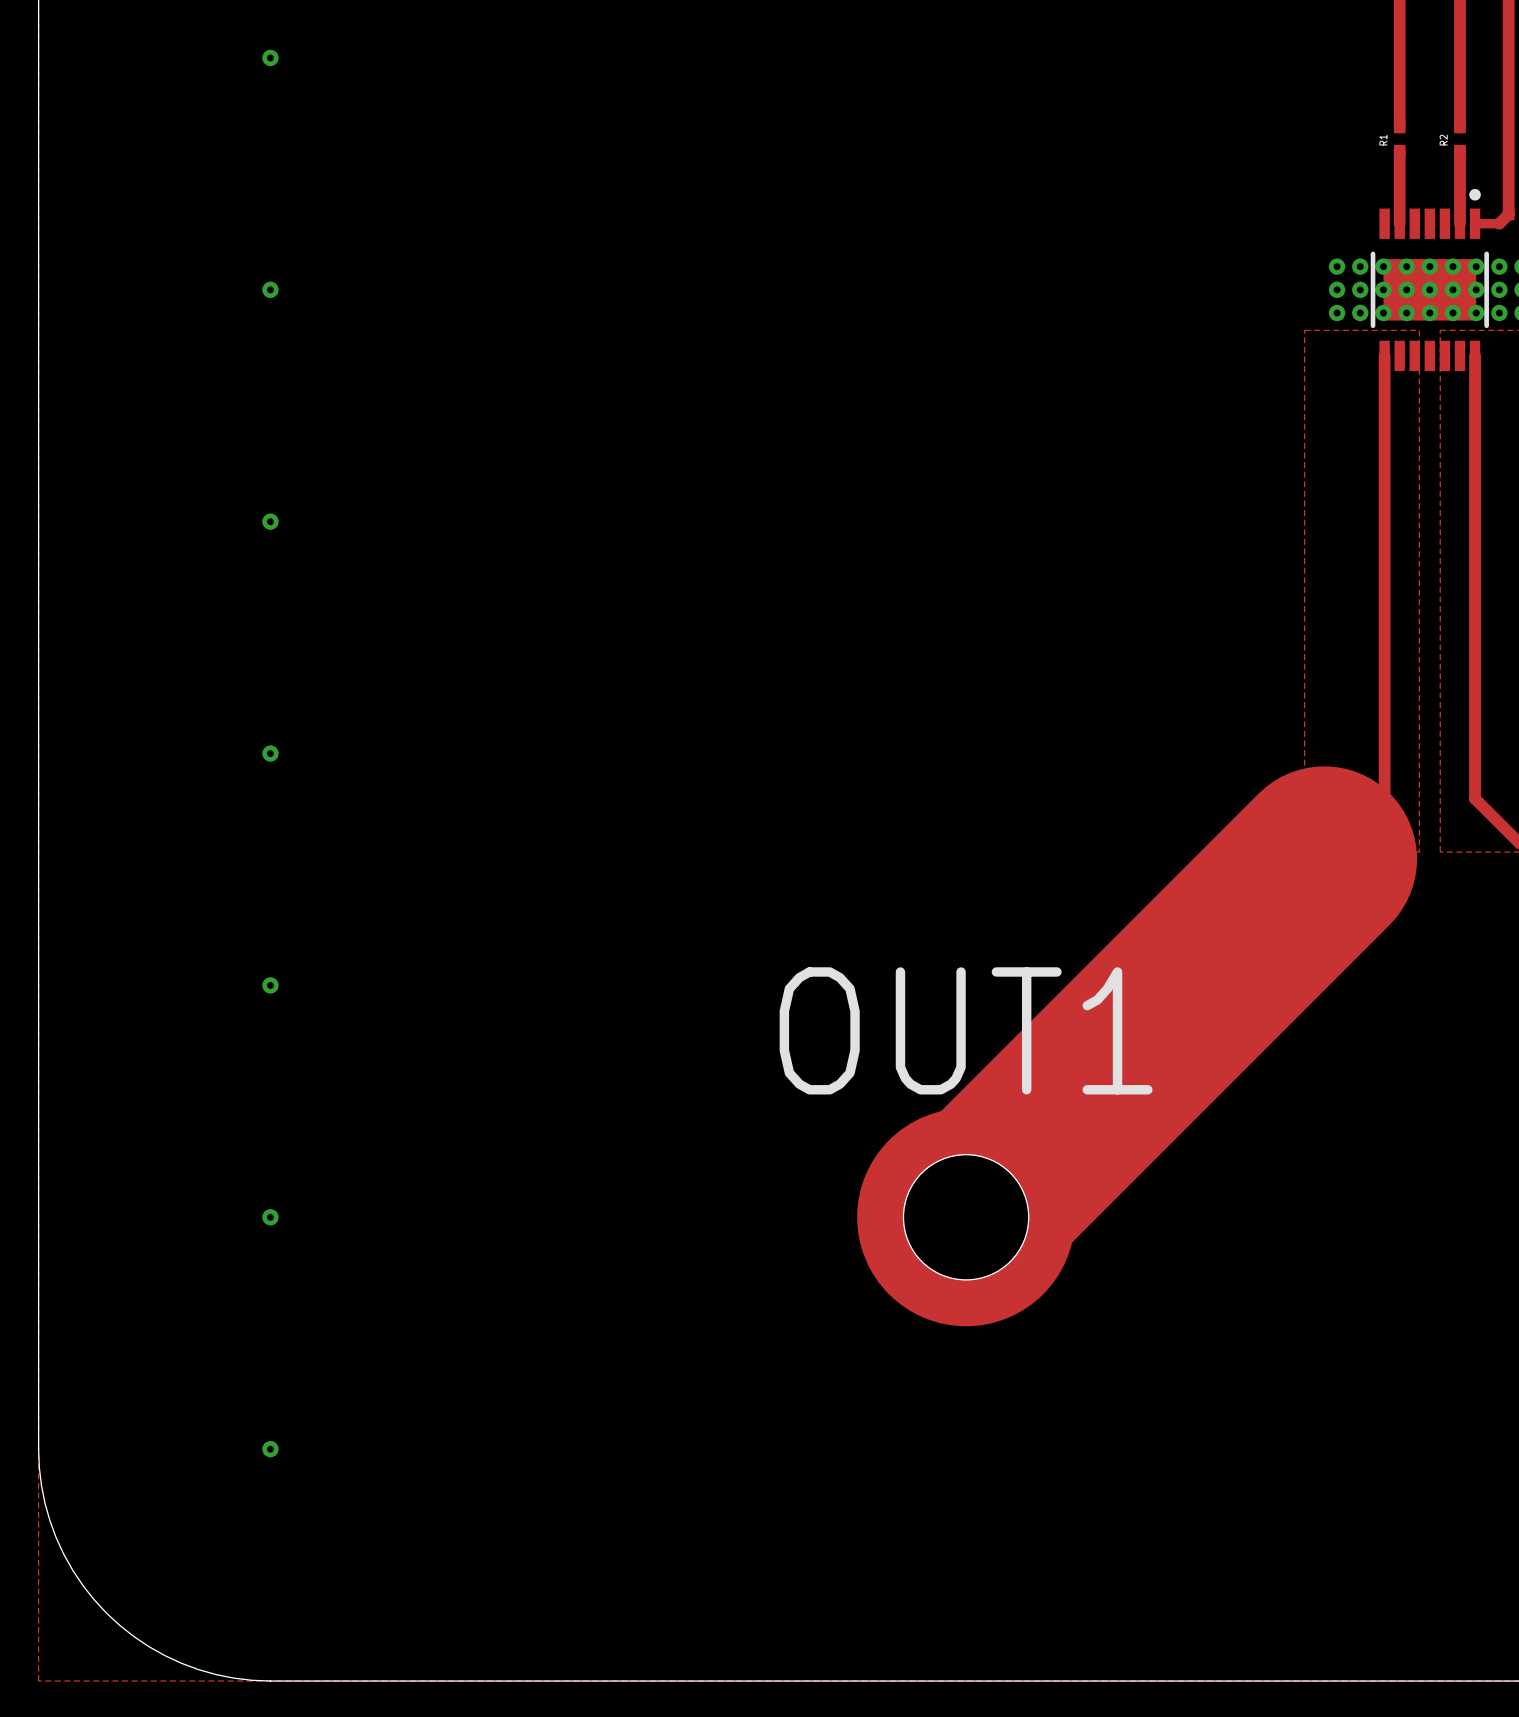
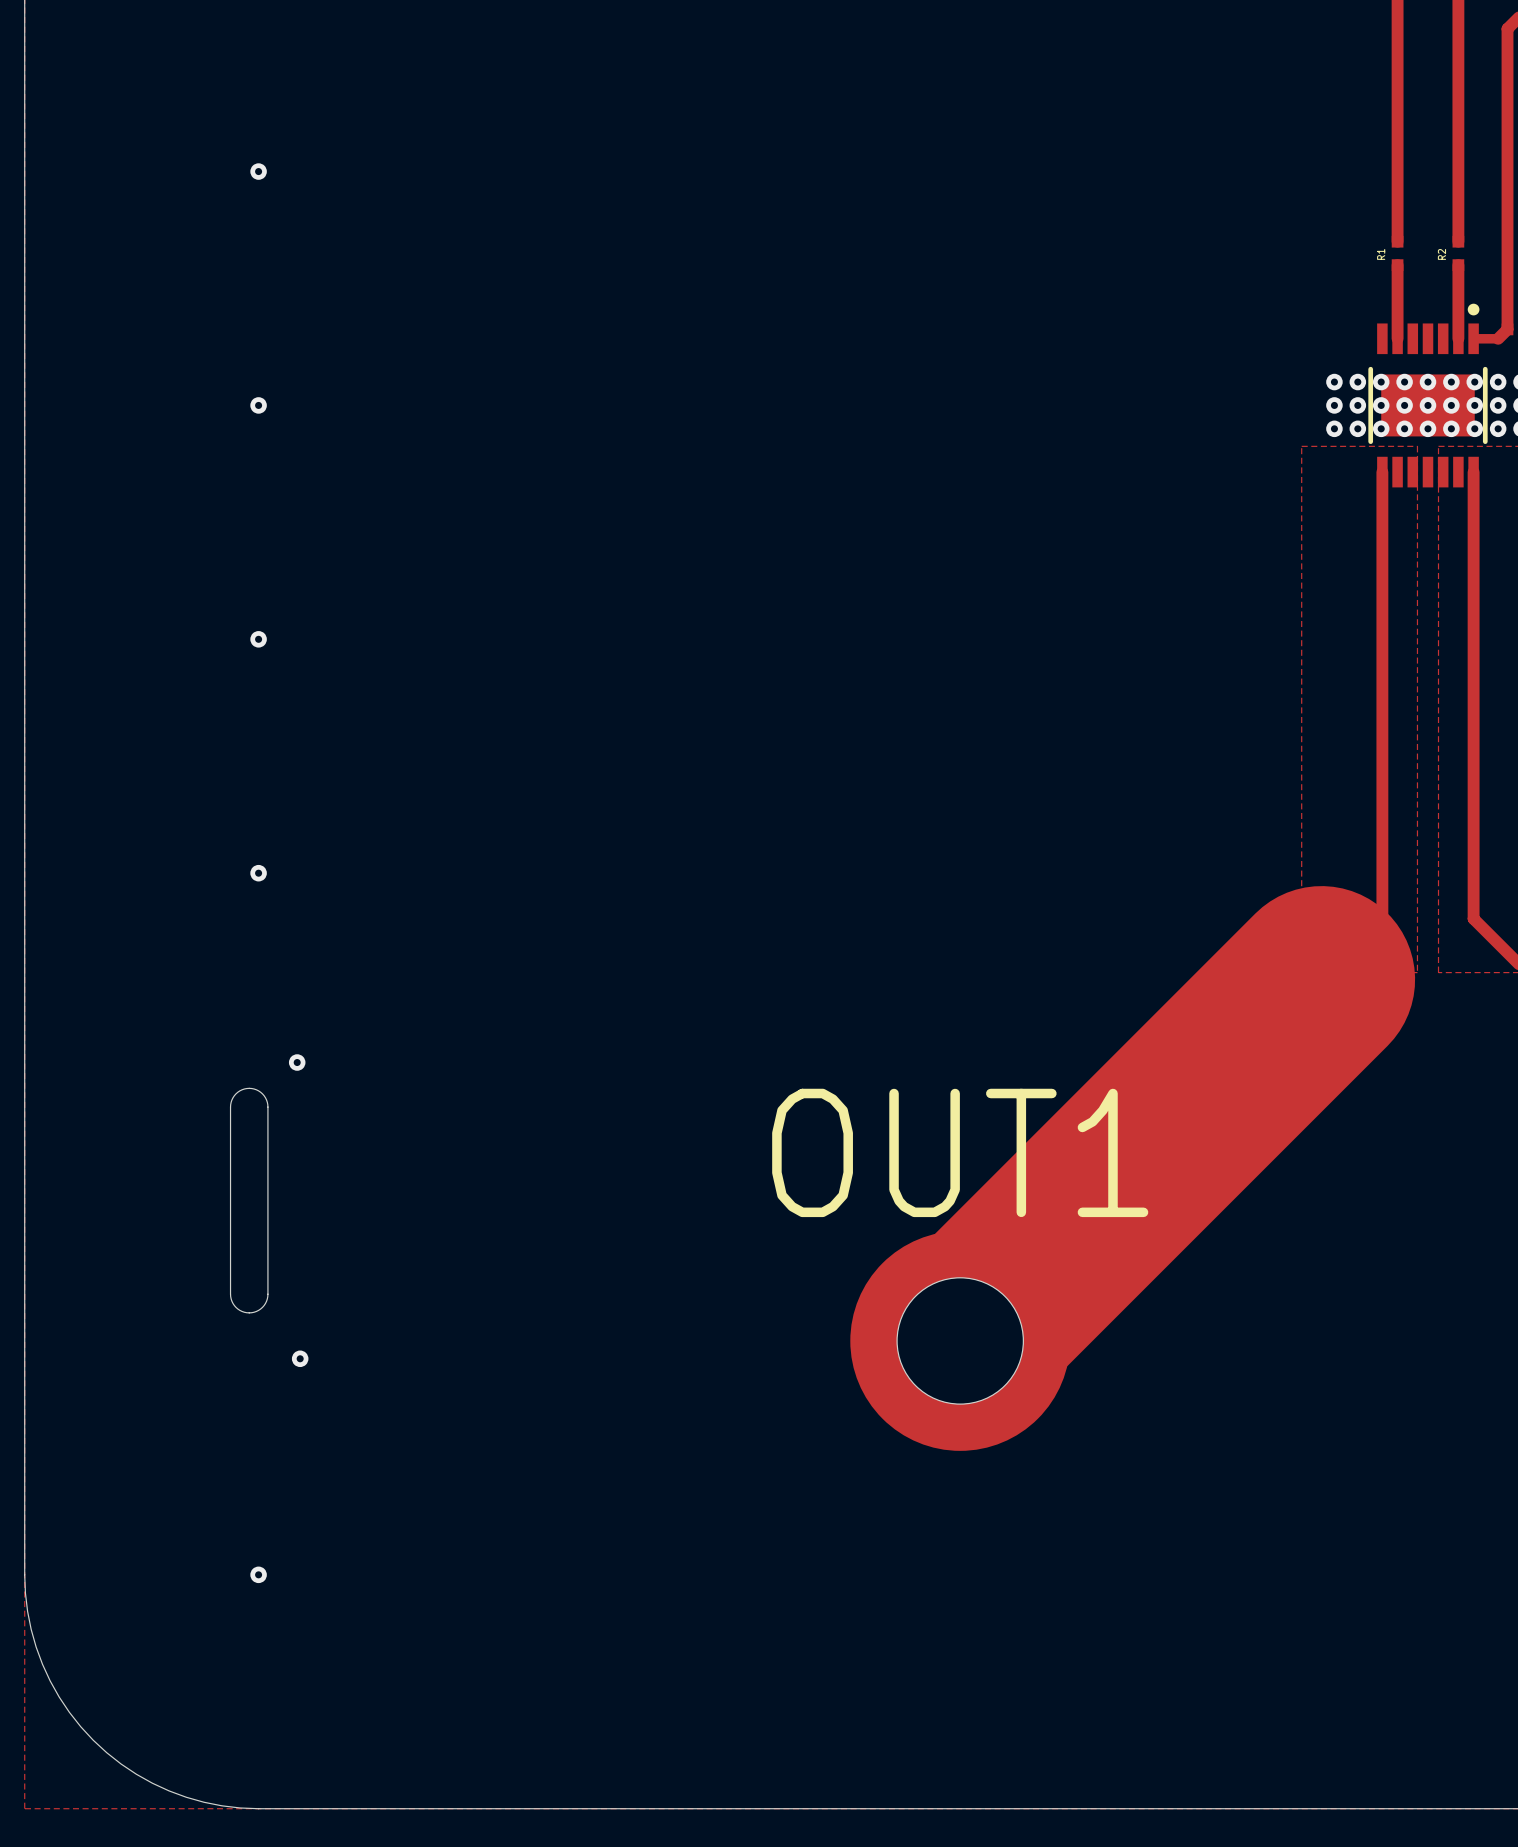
board edge: none -> (249, 1088) (236, 1093) (230, 1107) (230, 1296) (236, 1307) (249, 1312) (262, 1307) (267, 1294) (267, 1104) (262, 1093) (249, 1088)
via position: (270, 985) -> (297, 1062)
via position: (270, 1217) -> (300, 1358)

